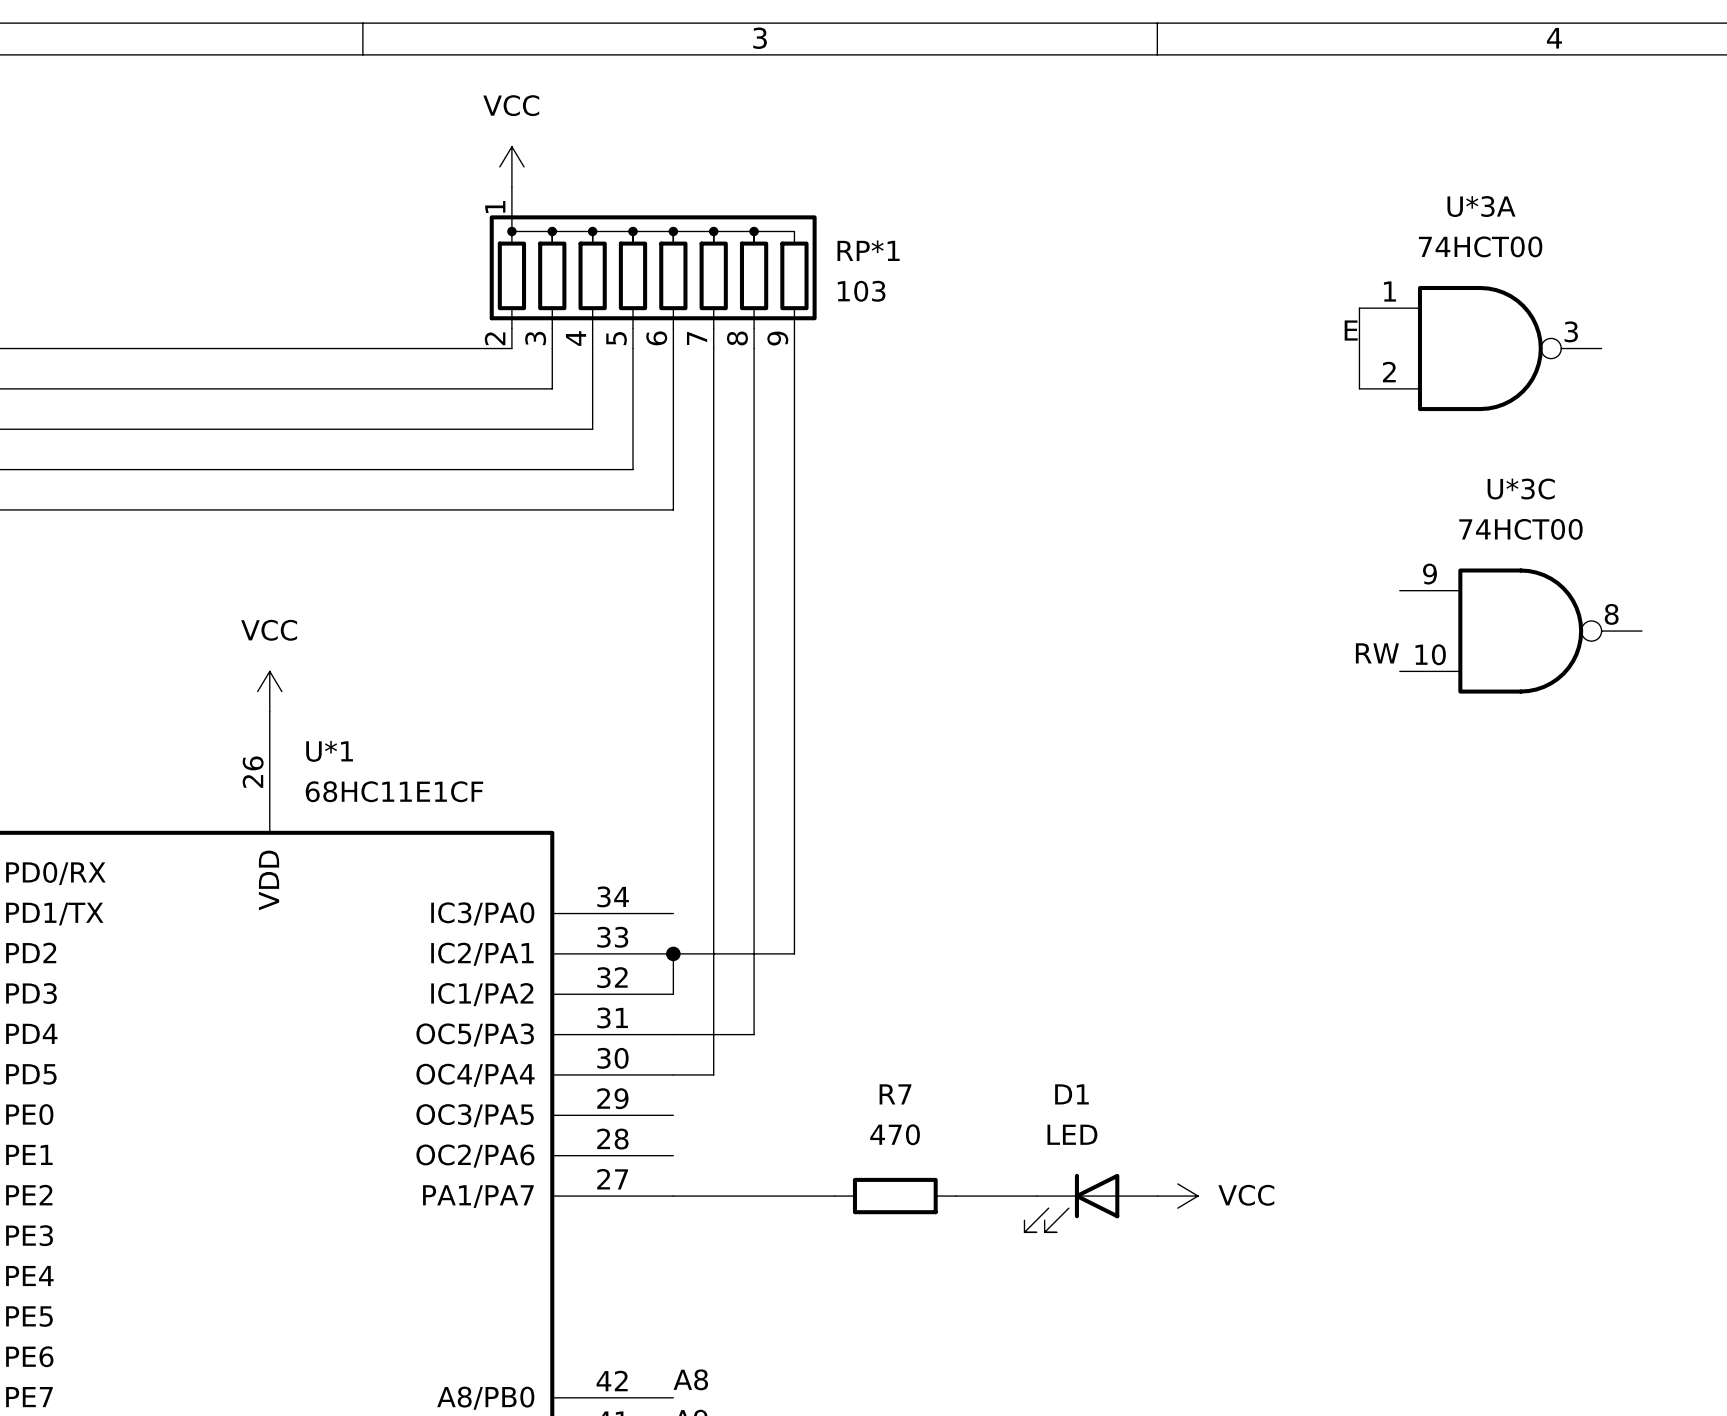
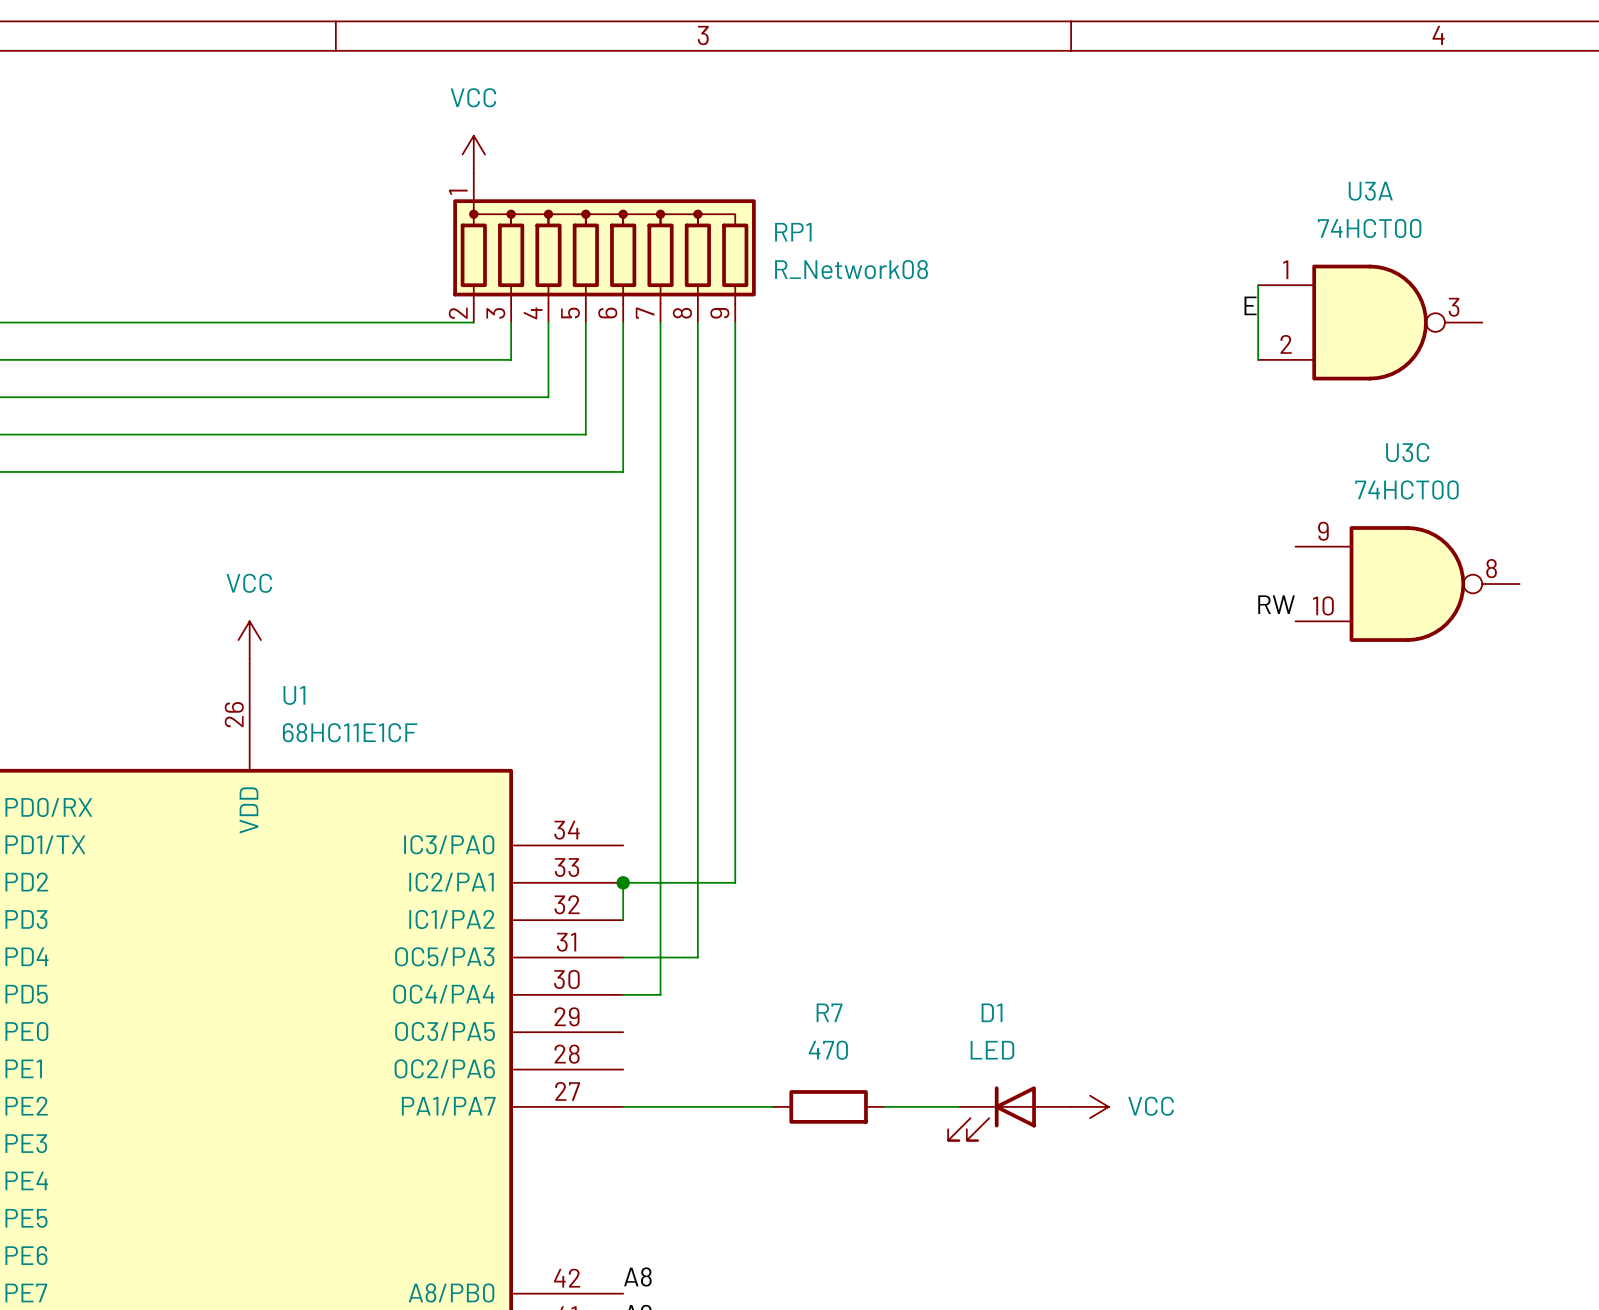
U*3A name: U*3A (1481, 206) -> U3A (1370, 191)
RP*1 name: RP*1 (868, 250) -> RP1 (793, 232)
RP*1 value: 103 (861, 291) -> R_Network08 (851, 269)
U*3C name: U*3C (1521, 489) -> U3C (1407, 452)
U*1 name: U*1 (329, 751) -> U1 (294, 695)

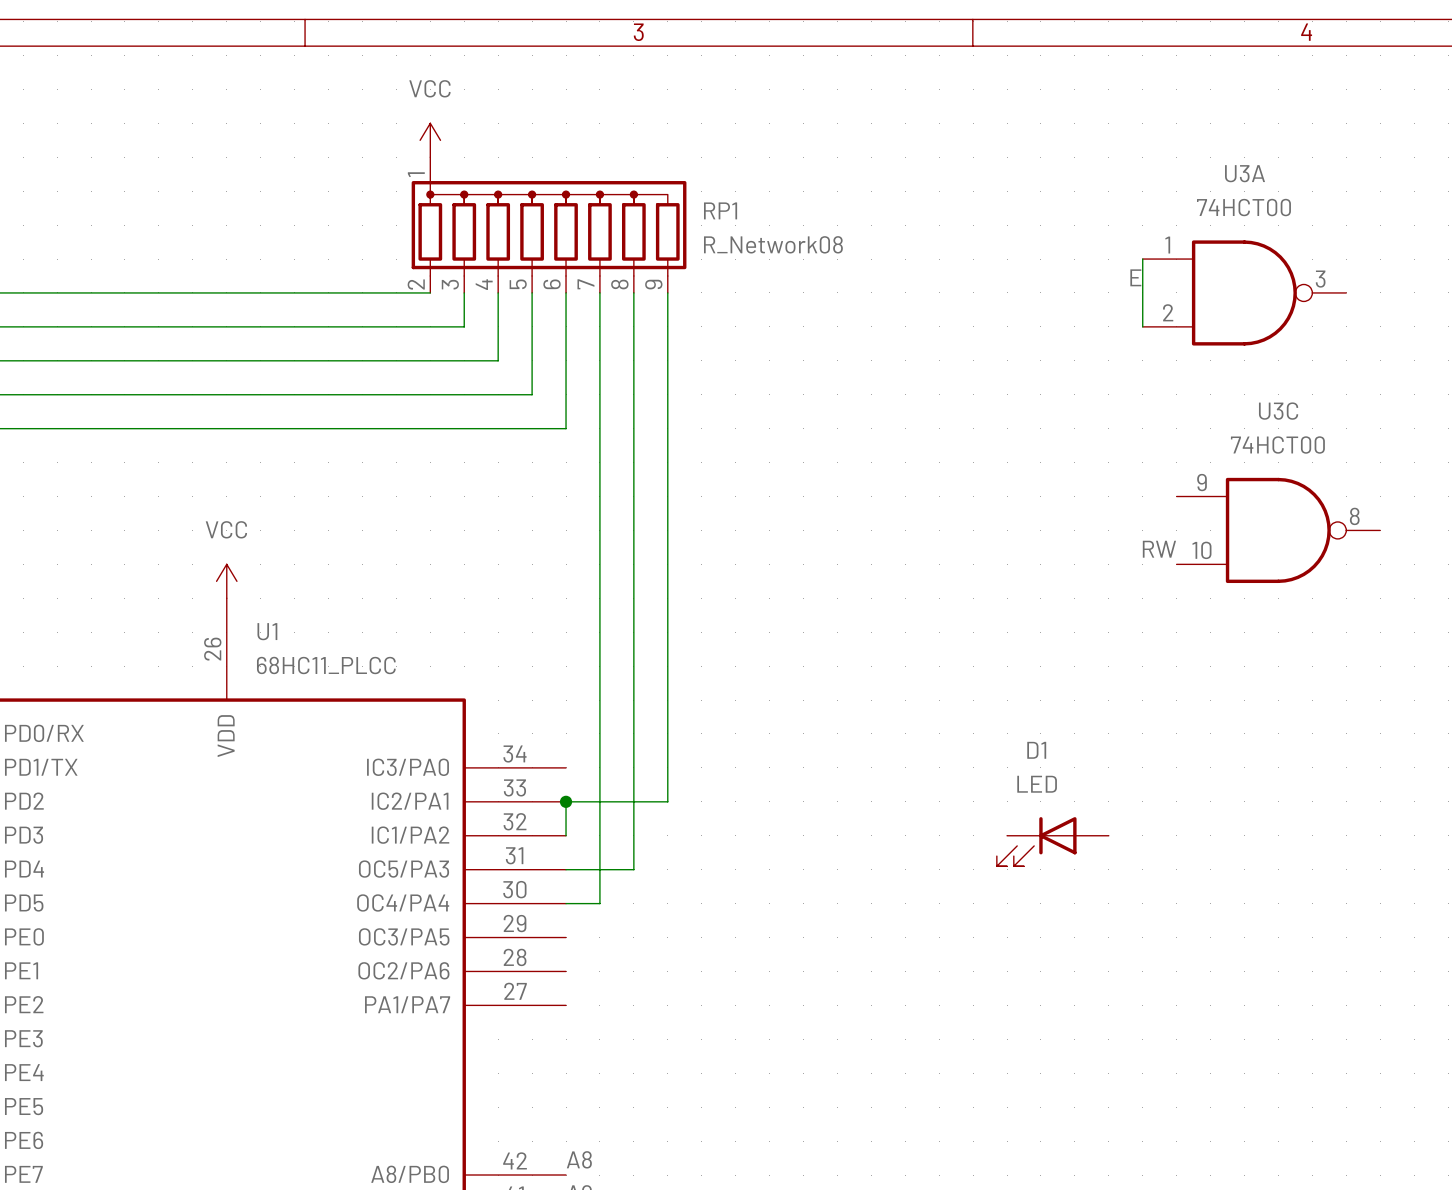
U1 value: 68HC11E1CF (350, 732) -> 68HC11_PLCC (326, 665)
wire: (623, 1106) (772, 1106) -> none
R7: 470 (828, 1106) -> none
wire: (884, 1106) (959, 1106) -> none
power symbol: VCC (1090, 1106) -> none
D1 position: (1009, 1113) -> (1052, 841)

